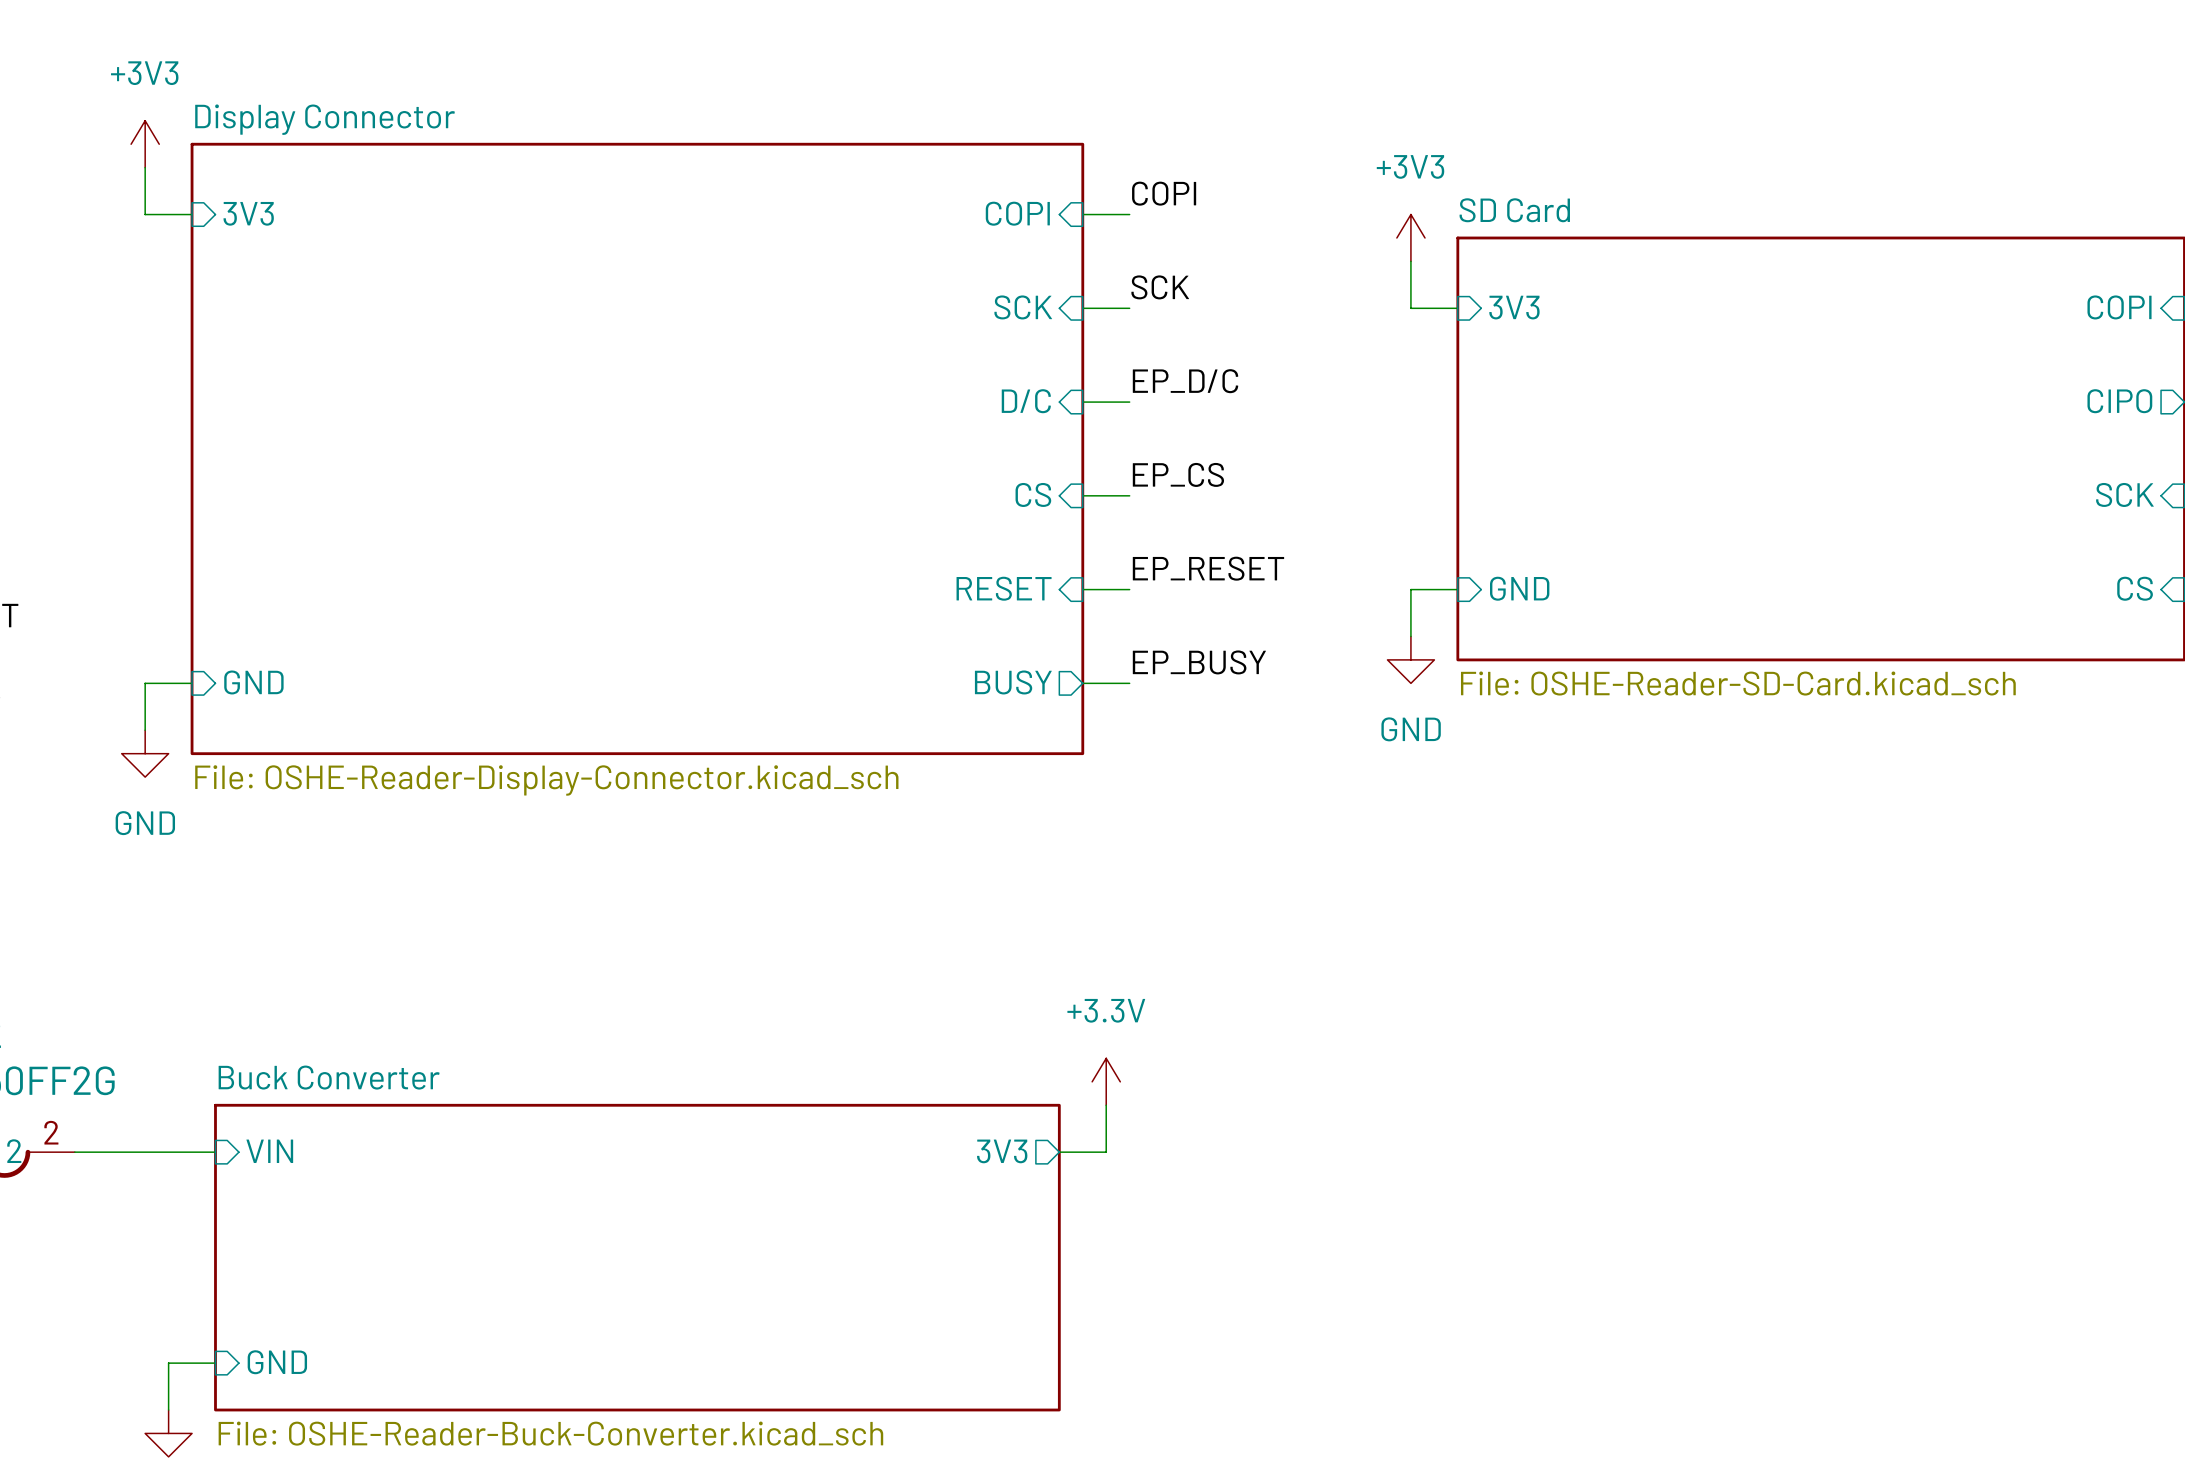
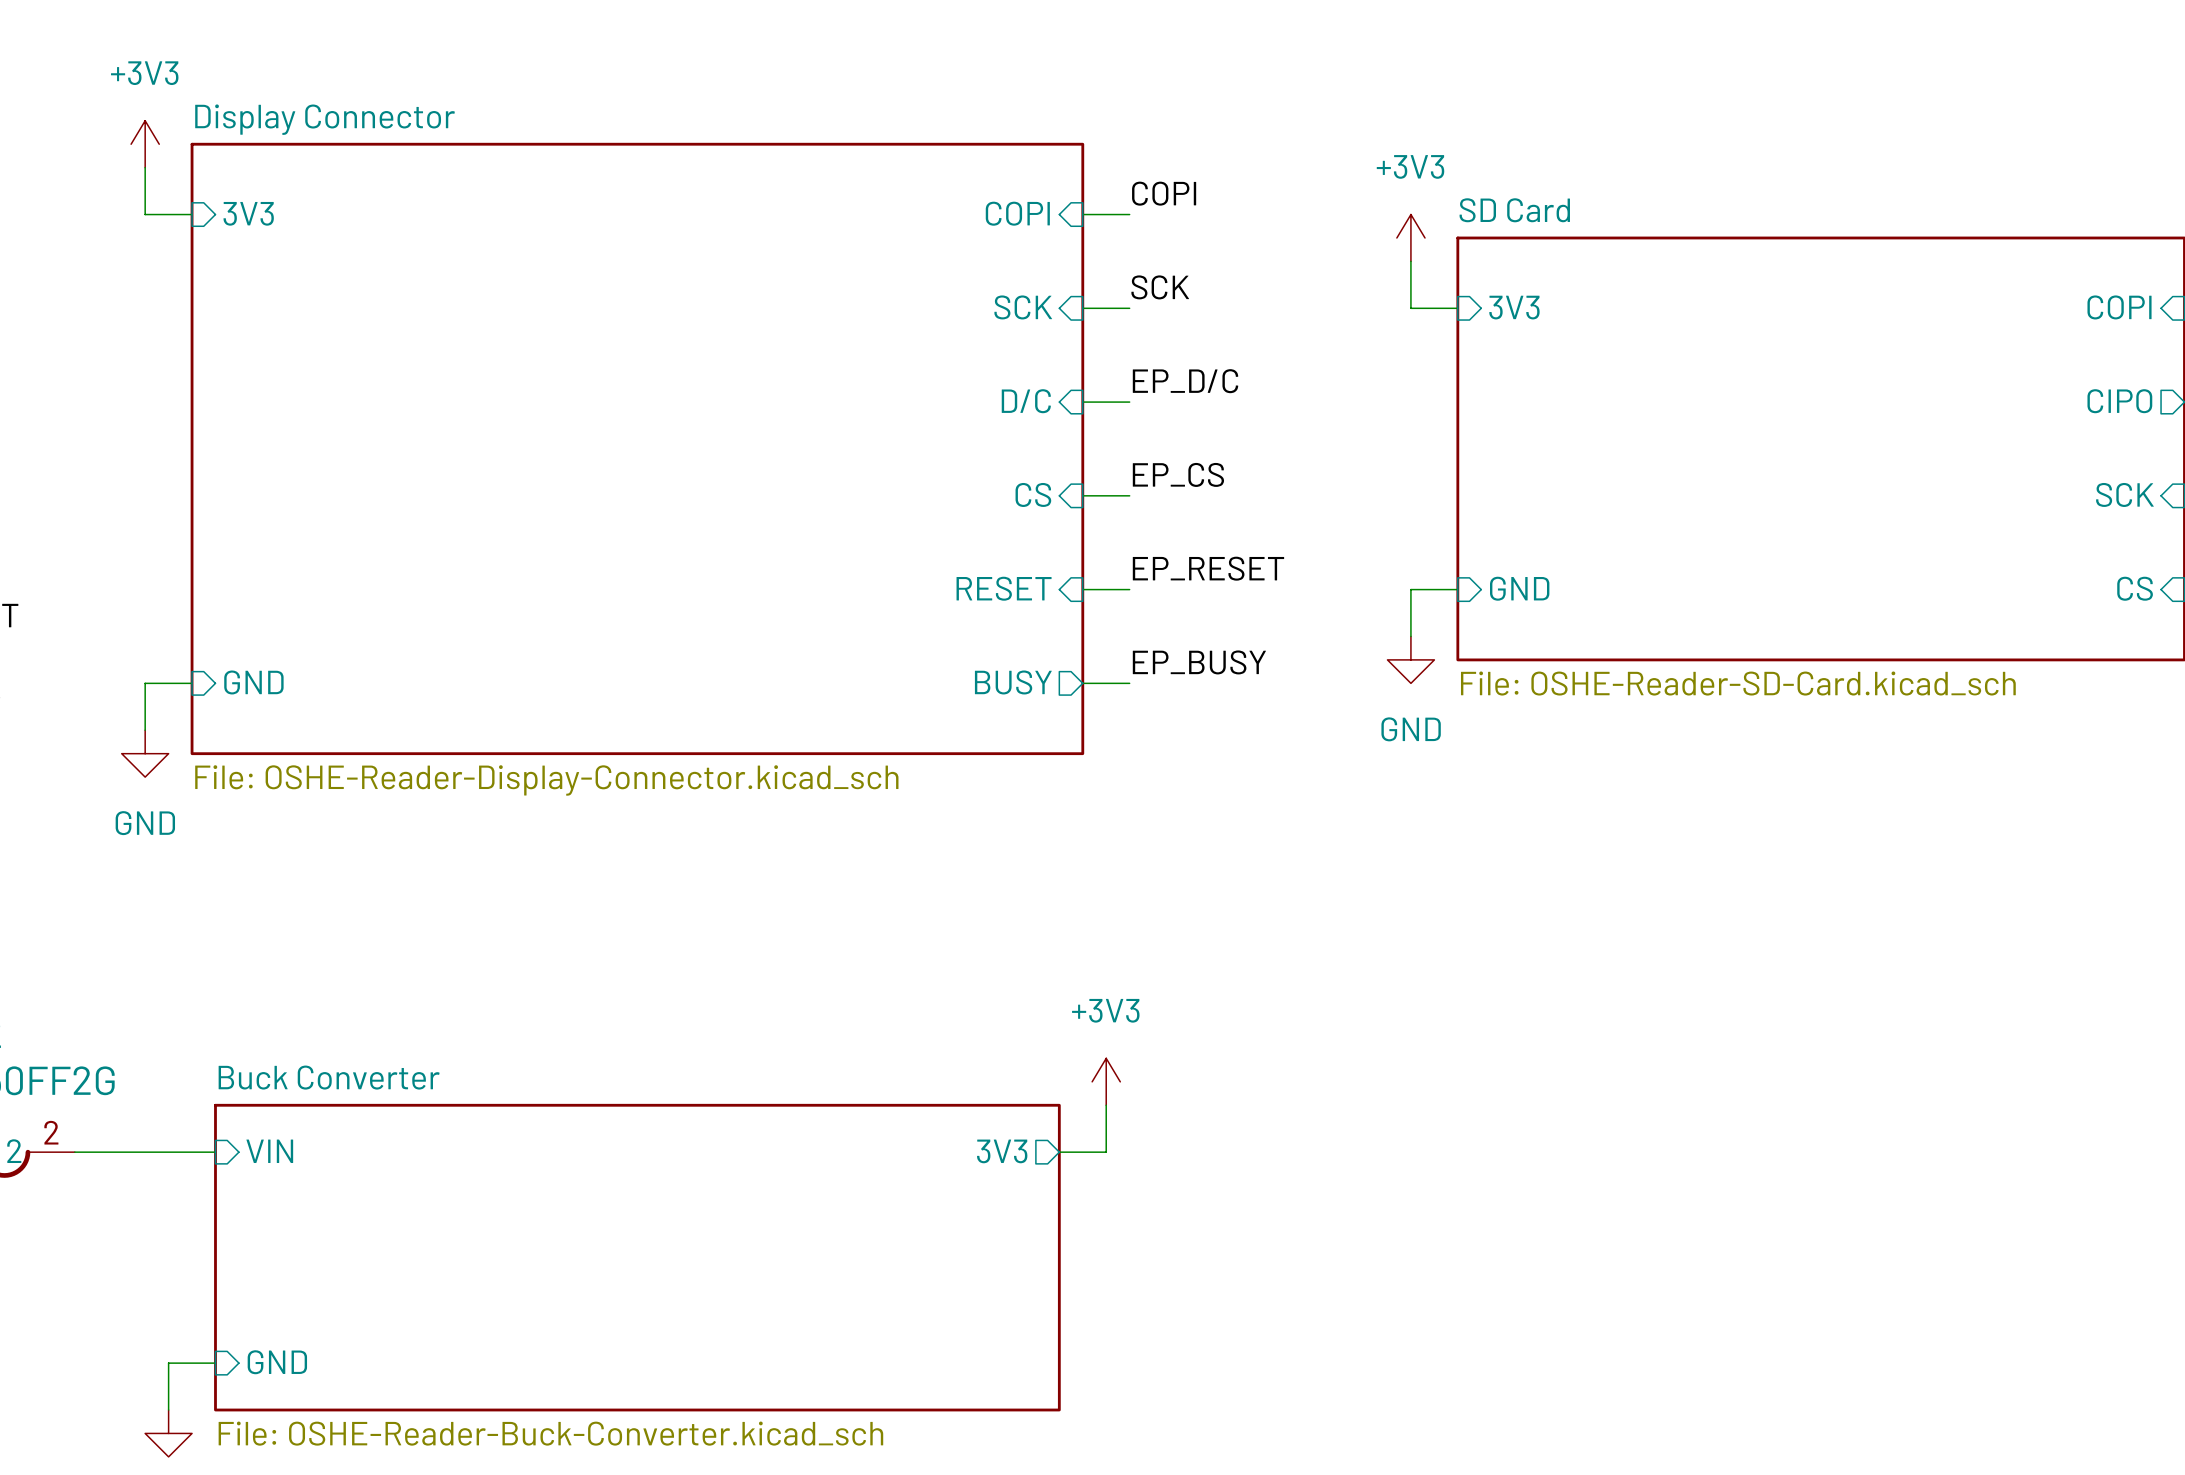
power symbol: +3.3V (1106, 1081) -> +3V3 (1106, 1081)

